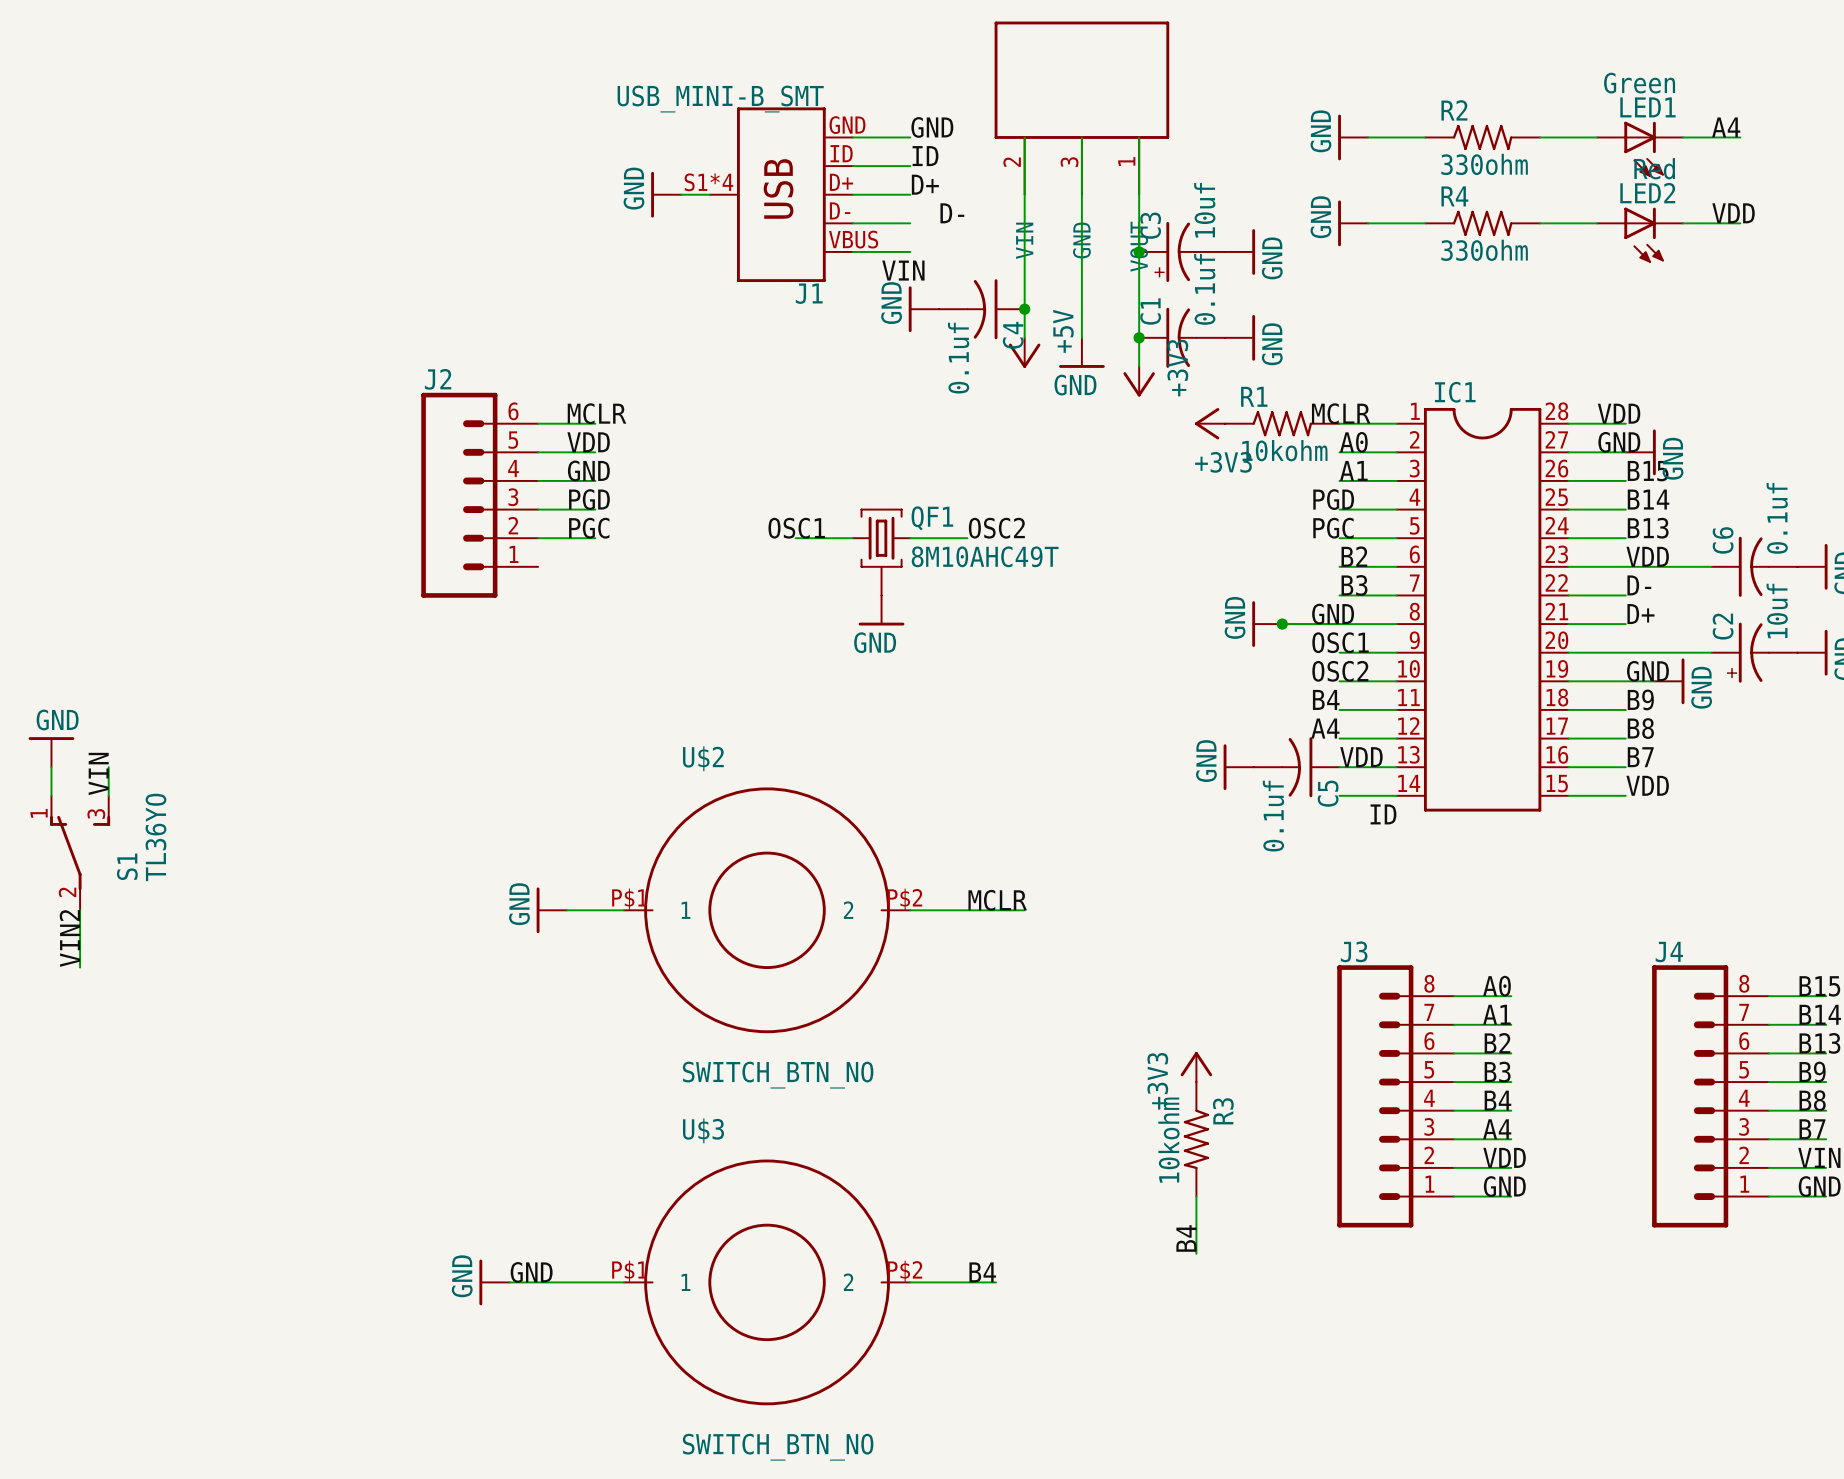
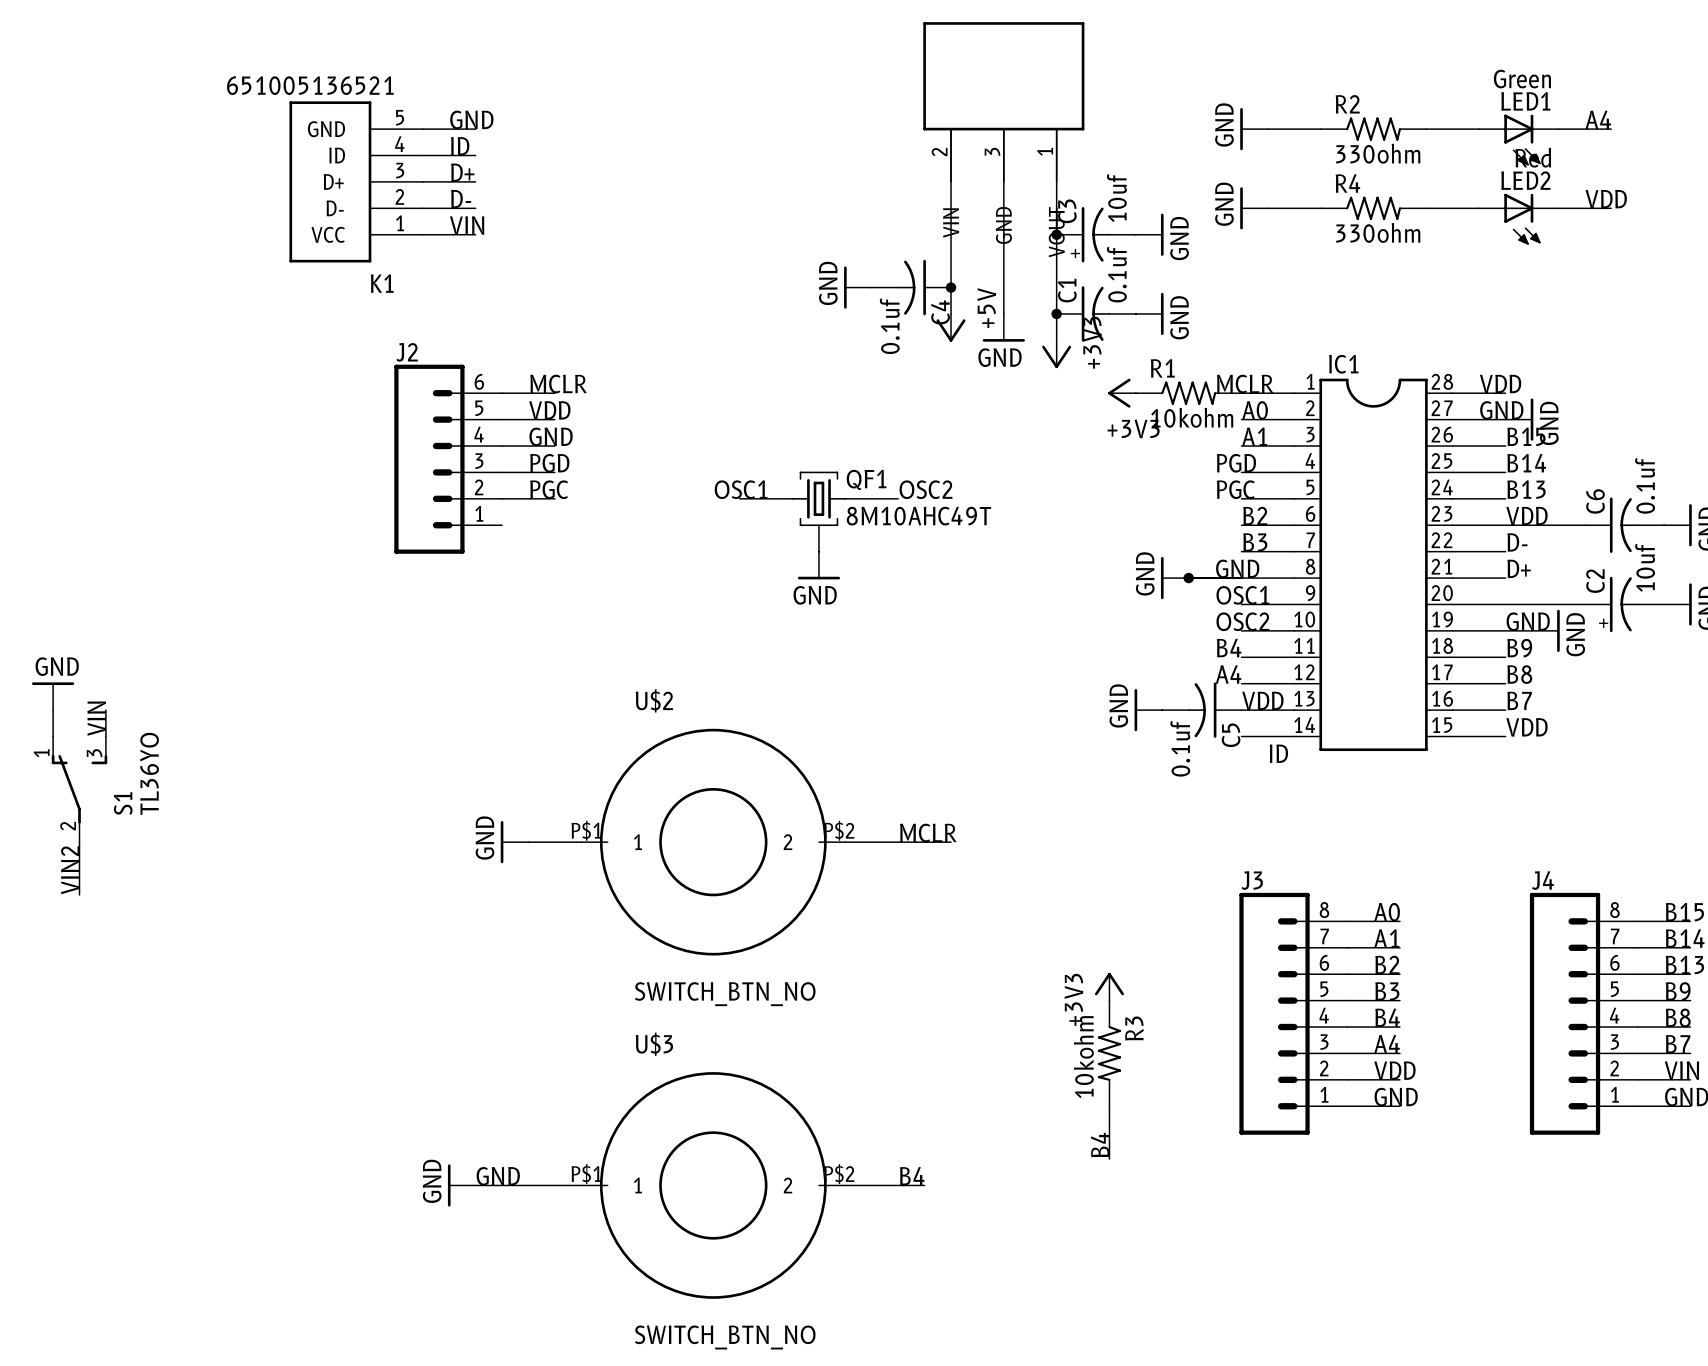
label: none -> GND (471, 119)
label: GND (932, 127) -> none
wire: none -> (422, 129) (475, 129)
wire: (852, 137) (910, 137) -> none
label: none -> ID (460, 146)
label: ID (925, 156) -> none
wire: none -> (422, 155) (475, 155)
wire: (852, 166) (910, 166) -> none
label: none -> D+ (462, 172)
label: D+ (925, 184) -> none
K1: none -> 651005136521 (356, 181)
wire: none -> (422, 181) (475, 181)
power symbol: GND (666, 194) -> none
wire: (681, 194) (709, 194) -> none
J1: USB_MINI-B_SMT (781, 194) -> none
wire: (852, 194) (910, 194) -> none
label: none -> D- (461, 199)
label: D- (952, 213) -> none
wire: none -> (422, 208) (475, 208)
wire: (852, 223) (910, 223) -> none
label: none -> VIN (467, 225)
wire: none -> (422, 234) (475, 234)
wire: (852, 251) (910, 251) -> none
label: VIN (903, 270) -> none

